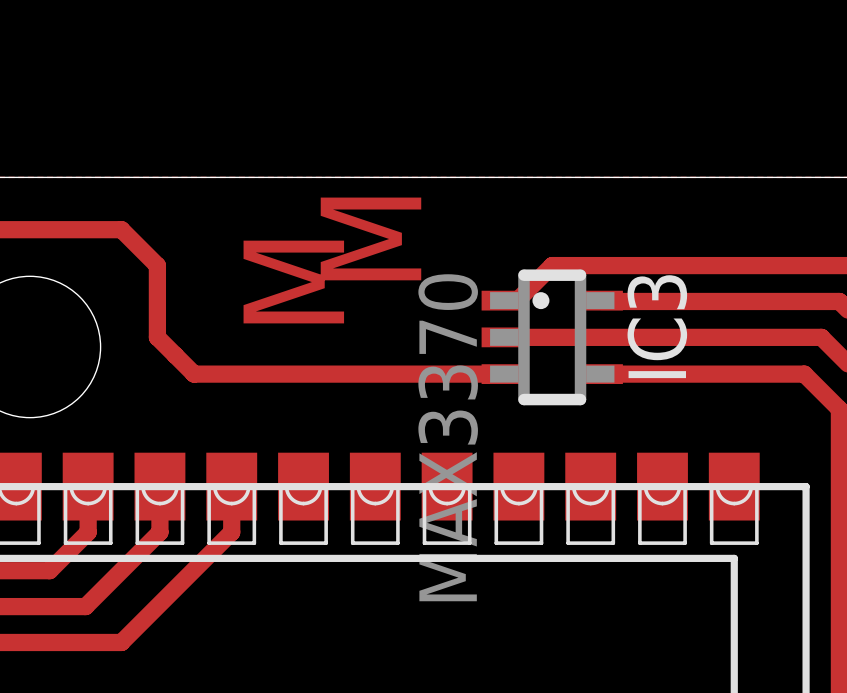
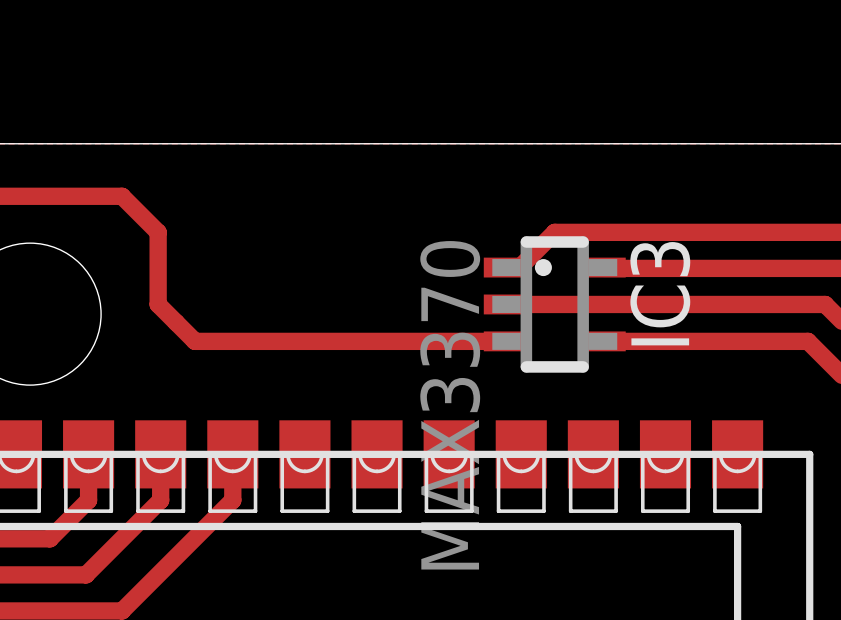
text: M (370, 238) -> none
text: M (293, 282) -> none

